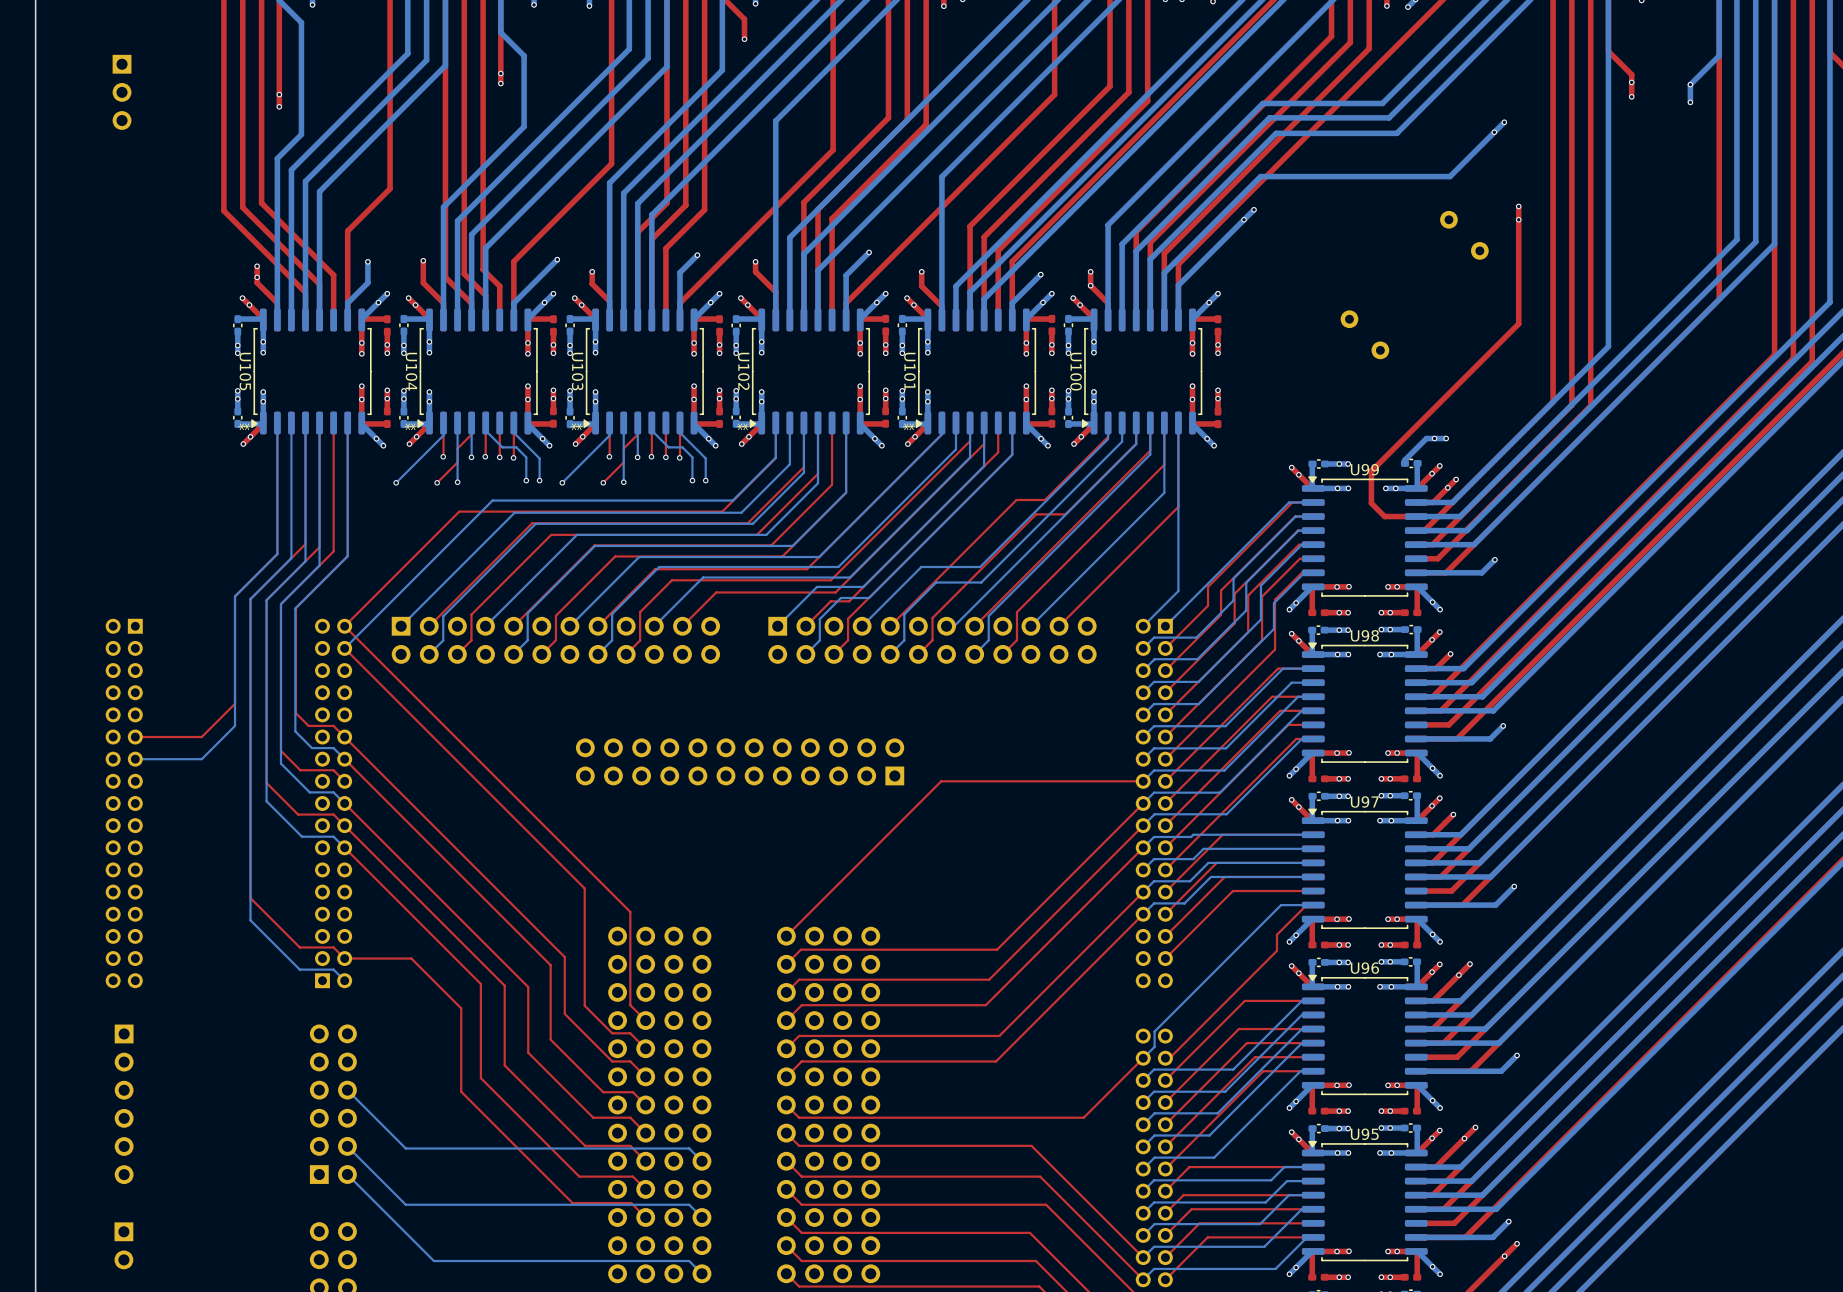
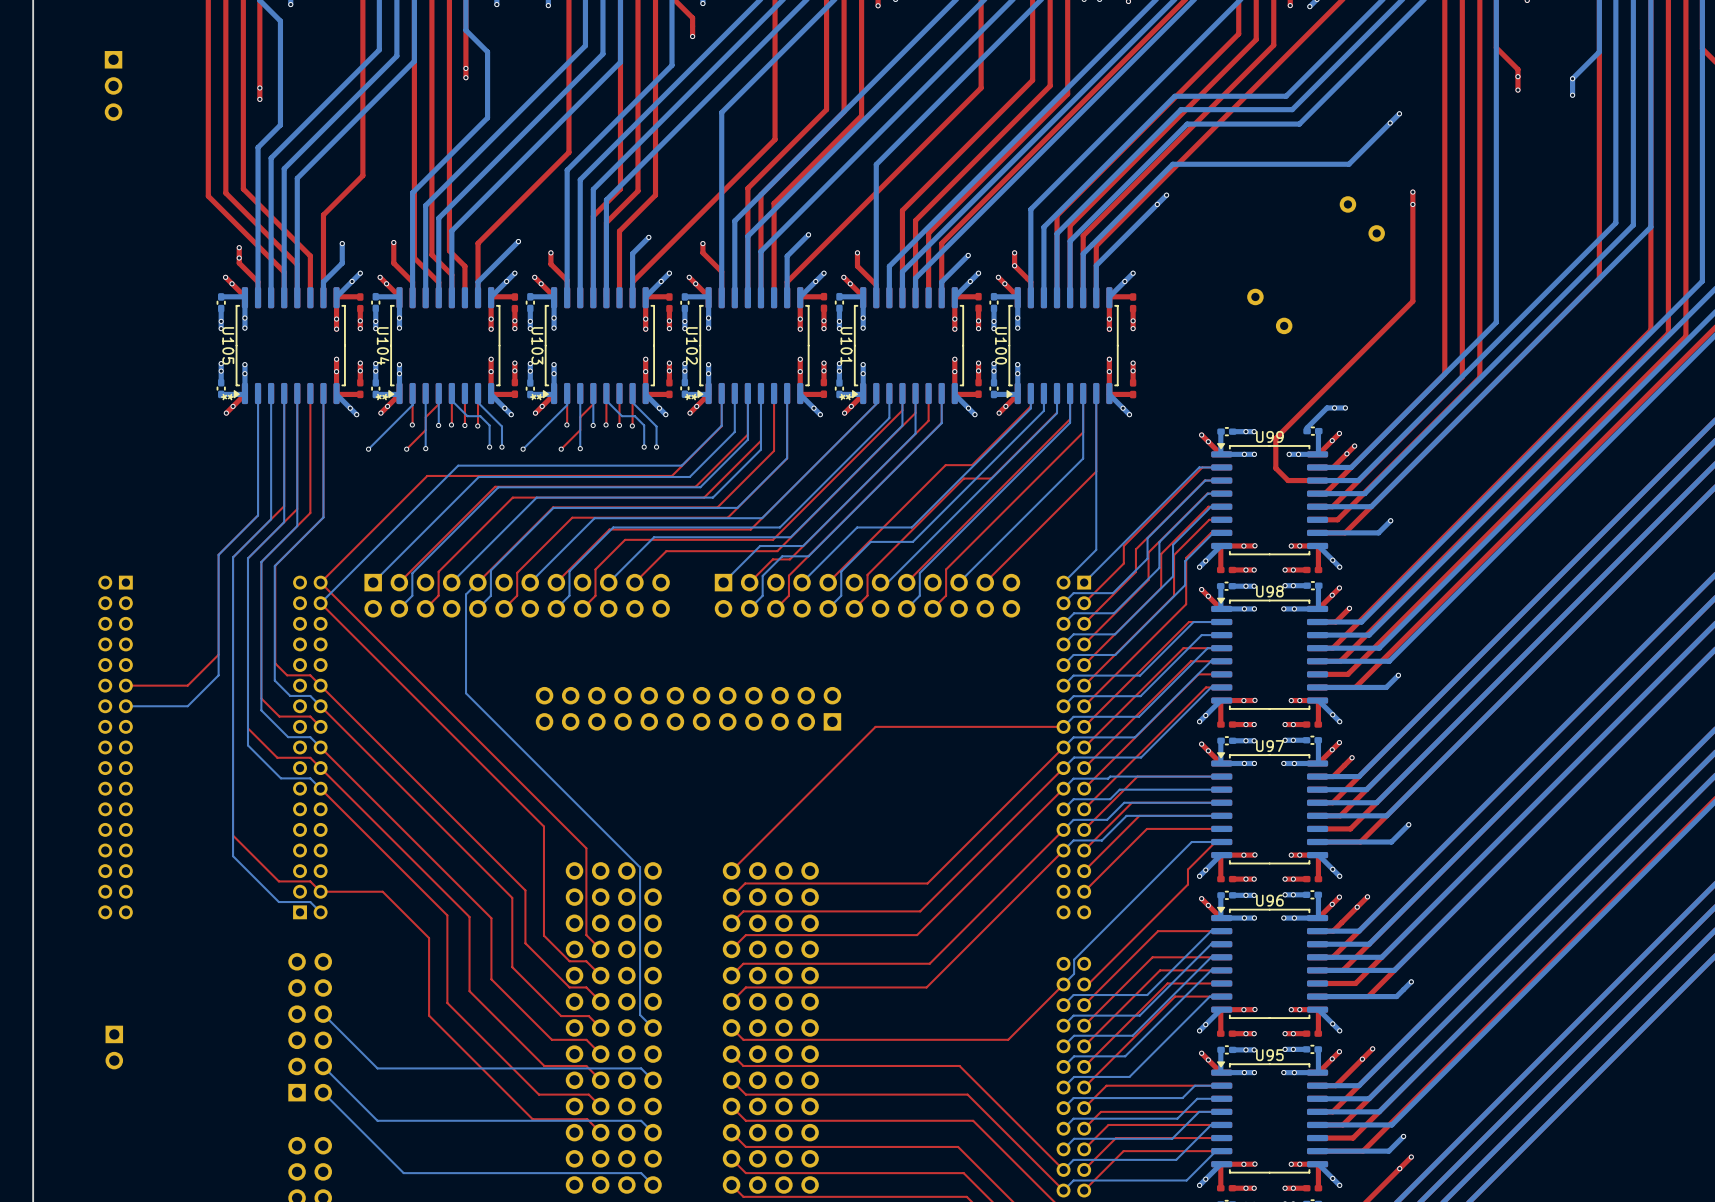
bottom track: none -> (477, 582) (466, 594) (466, 693) (640, 867) (640, 1014) (653, 1027)
part: (124, 1104) -> none
part position: (123, 1245) -> (114, 1047)

